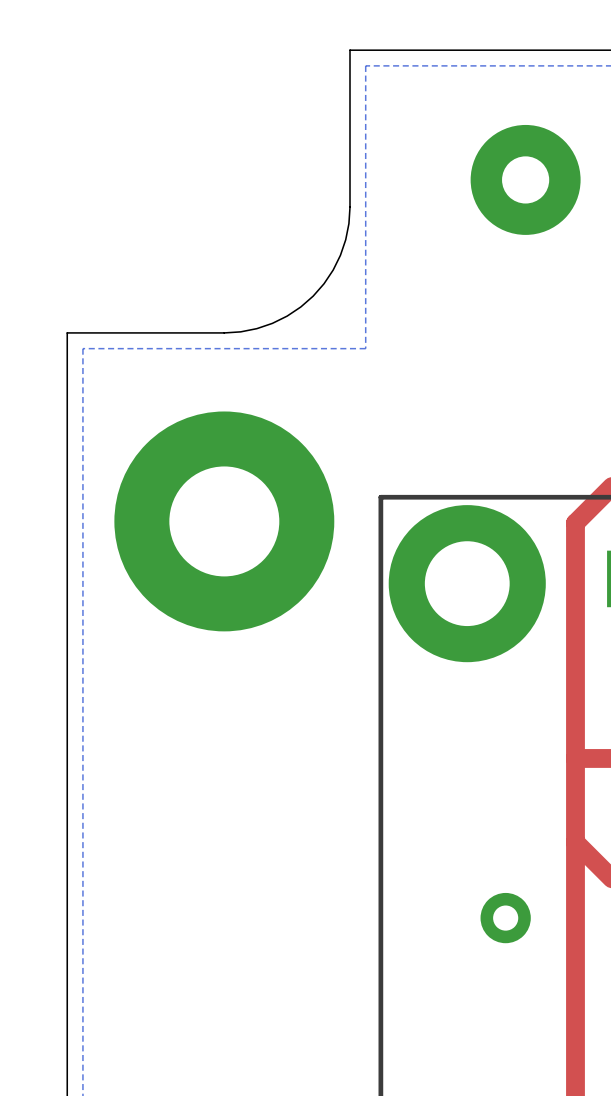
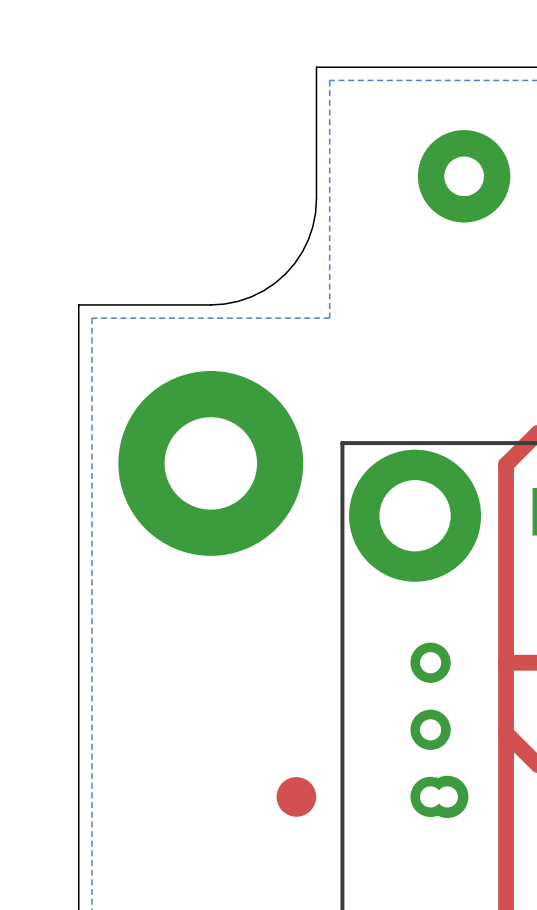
part: none -> (430, 729)
part: none -> (296, 796)

